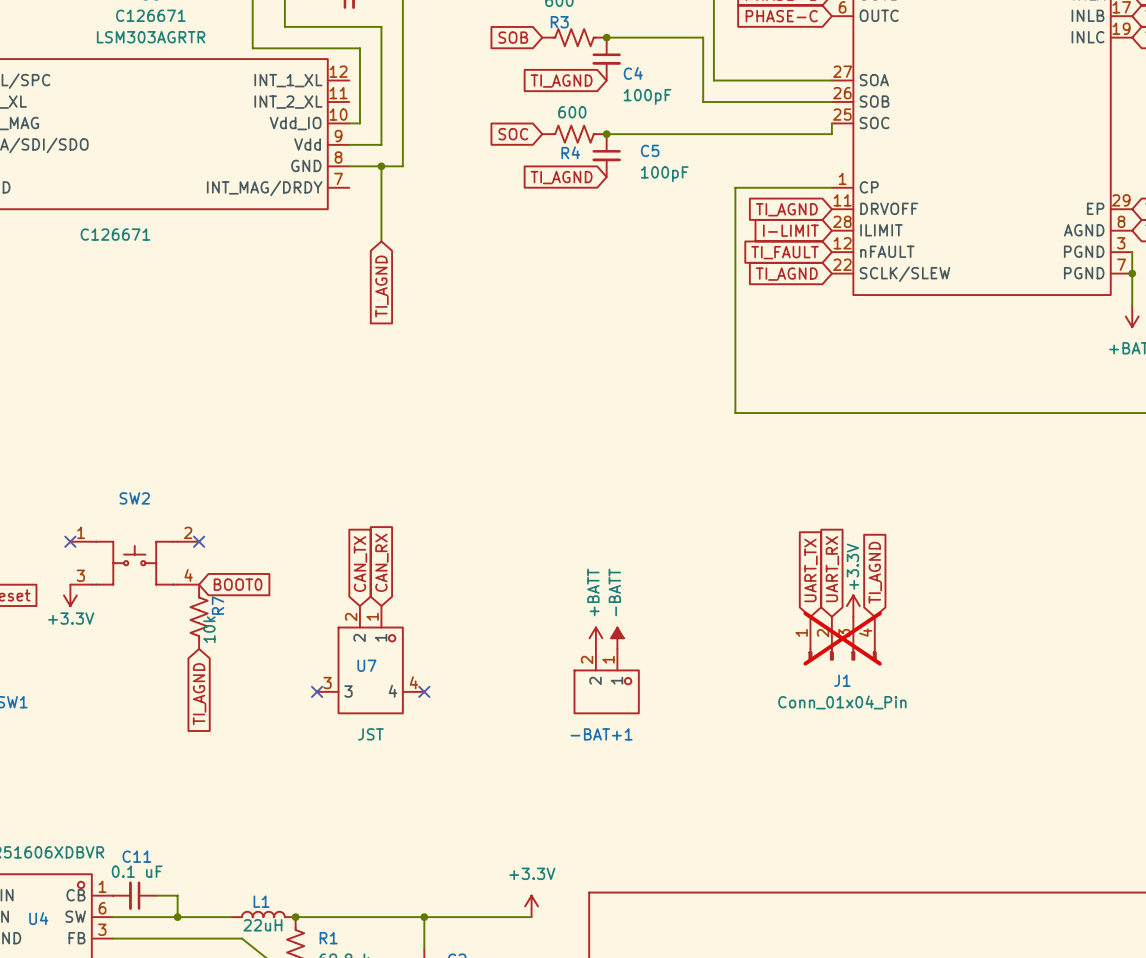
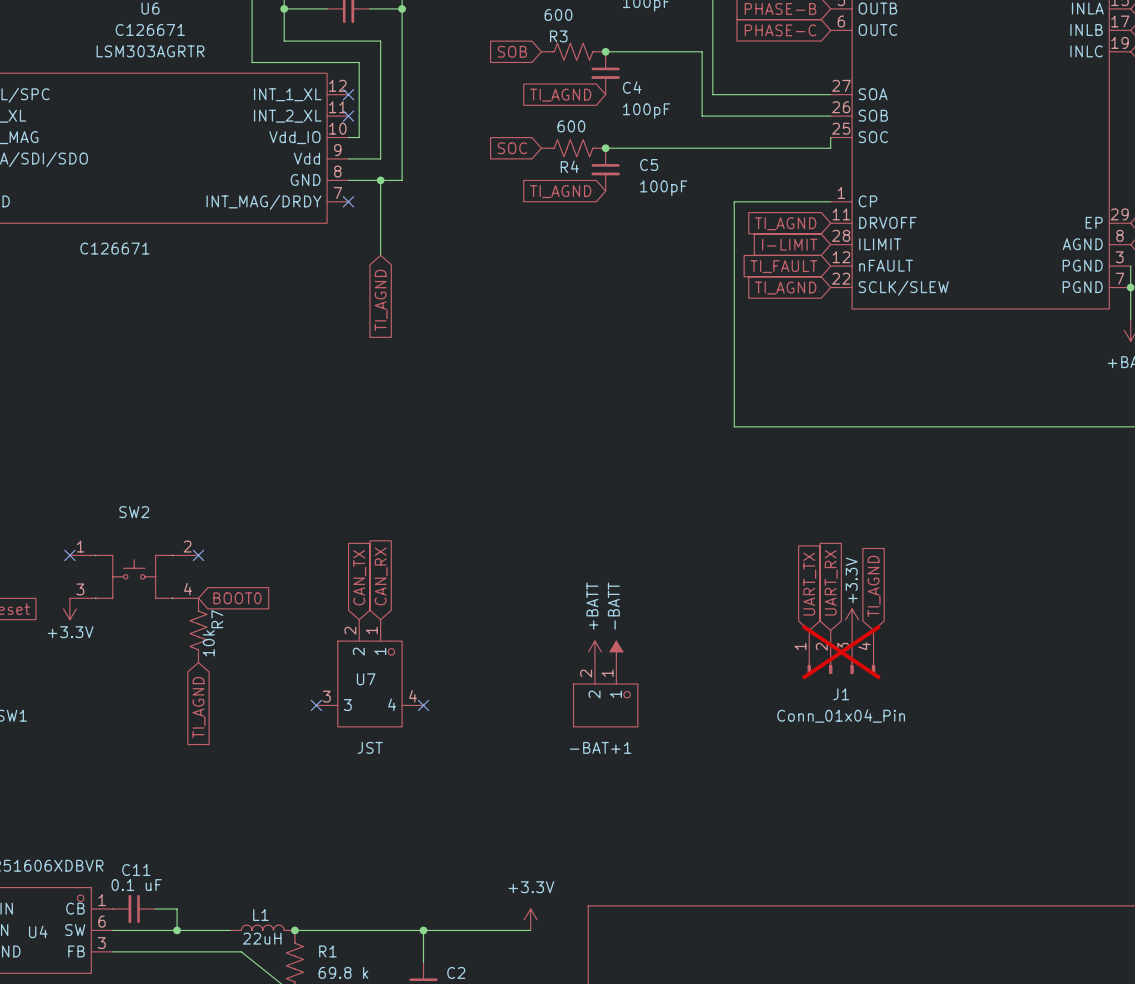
no-connect mark: none -> (348, 94)
no-connect mark: none -> (348, 116)
no-connect mark: none -> (348, 201)

